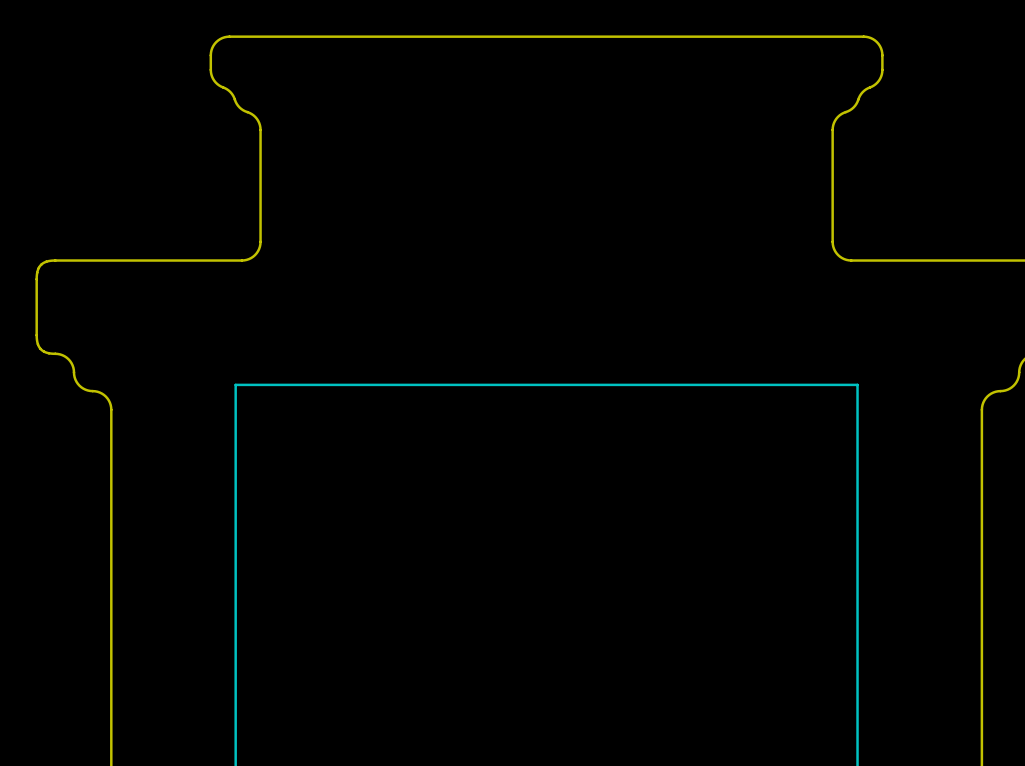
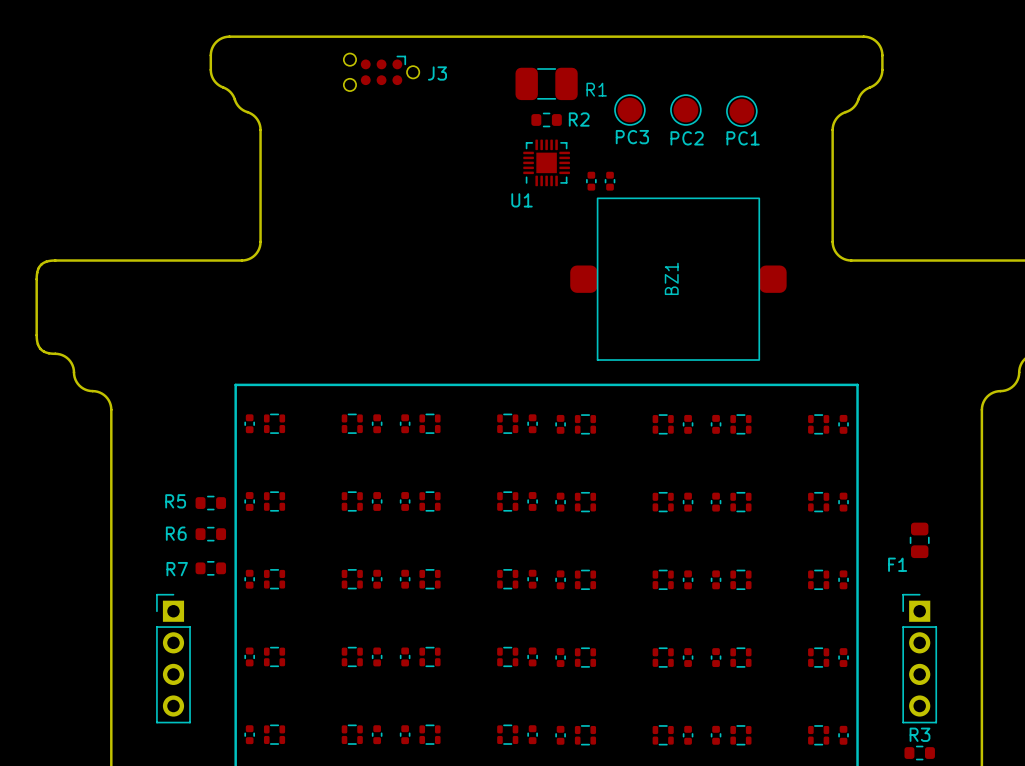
J3: none -> (381, 72)
R1: none -> (546, 83)
part: none -> (629, 110)
part: none -> (685, 110)
part: none -> (741, 111)
R2: none -> (546, 119)
text: none -> PC3 (632, 137)
text: none -> PC2 (687, 138)
text: none -> PC1 (743, 138)
U1: none -> (546, 162)
part: none -> (591, 181)
part: none -> (610, 181)
BZ1: none -> (678, 279)
part: none -> (249, 423)
part: none -> (274, 423)
part: none -> (352, 423)
part: none -> (377, 423)
part: none -> (405, 423)
part: none -> (430, 423)
part: none -> (507, 423)
part: none -> (532, 423)
part: none -> (560, 424)
part: none -> (585, 424)
part: none -> (663, 424)
part: none -> (688, 424)
part: none -> (716, 424)
part: none -> (740, 424)
part: none -> (818, 424)
part: none -> (843, 424)
part: none -> (249, 501)
part: none -> (274, 501)
part: none -> (352, 501)
part: none -> (377, 501)
part: none -> (405, 501)
part: none -> (430, 501)
part: none -> (507, 501)
part: none -> (532, 501)
part: none -> (560, 502)
part: none -> (585, 502)
part: none -> (663, 502)
part: none -> (688, 502)
part: none -> (716, 502)
part: none -> (740, 502)
part: none -> (818, 502)
part: none -> (843, 502)
R5: none -> (210, 503)
R6: none -> (210, 534)
F1: none -> (919, 540)
R7: none -> (210, 568)
part: none -> (249, 579)
part: none -> (274, 579)
part: none -> (352, 579)
part: none -> (377, 579)
part: none -> (405, 579)
part: none -> (430, 579)
part: none -> (507, 579)
part: none -> (532, 579)
part: none -> (560, 579)
part: none -> (585, 579)
part: none -> (663, 579)
part: none -> (688, 579)
part: none -> (716, 579)
part: none -> (740, 579)
part: none -> (818, 579)
part: none -> (843, 579)
part: none -> (249, 656)
part: none -> (274, 656)
part: none -> (352, 656)
part: none -> (377, 656)
part: none -> (405, 656)
part: none -> (430, 656)
part: none -> (507, 656)
part: none -> (532, 656)
part: none -> (560, 657)
part: none -> (585, 657)
part: none -> (663, 657)
part: none -> (688, 657)
part: none -> (716, 657)
part: none -> (740, 657)
part: none -> (818, 657)
part: none -> (843, 657)
part: none -> (173, 658)
part: none -> (919, 658)
part: none -> (249, 734)
part: none -> (274, 734)
part: none -> (352, 734)
part: none -> (377, 734)
part: none -> (405, 734)
part: none -> (430, 734)
part: none -> (507, 734)
part: none -> (532, 734)
part: none -> (560, 735)
part: none -> (585, 735)
part: none -> (663, 735)
part: none -> (688, 735)
part: none -> (716, 735)
part: none -> (740, 735)
part: none -> (818, 735)
part: none -> (843, 735)
R3: none -> (919, 753)

